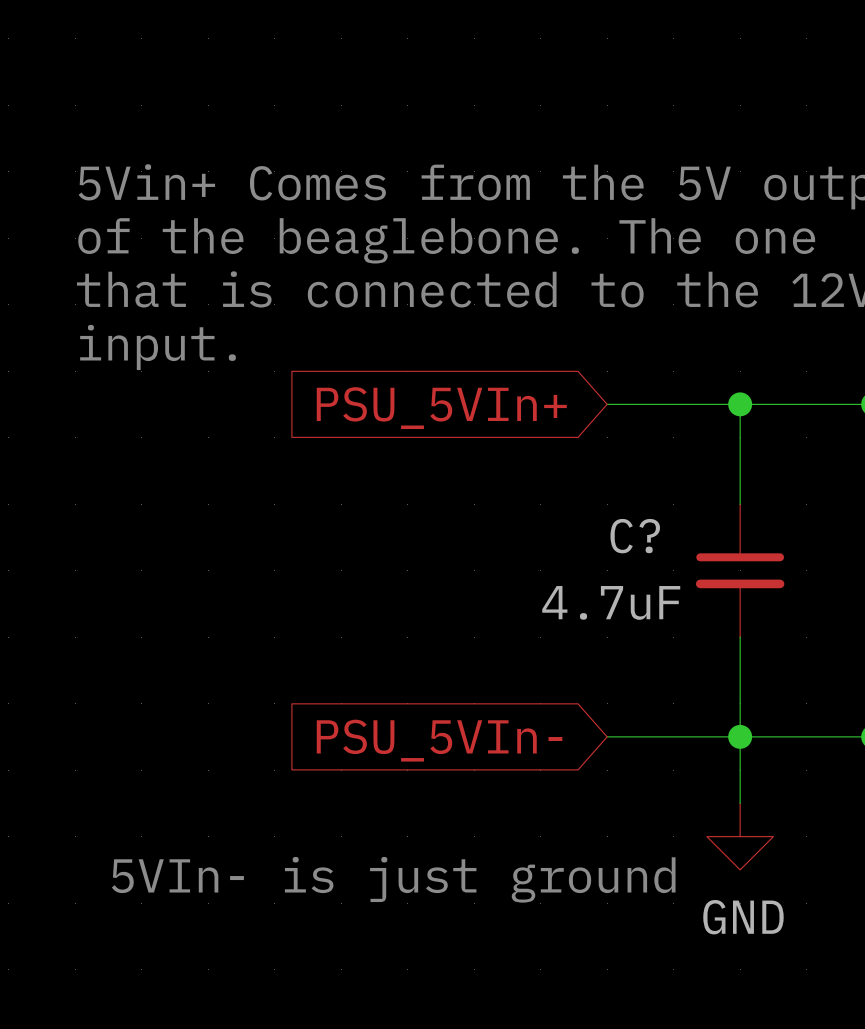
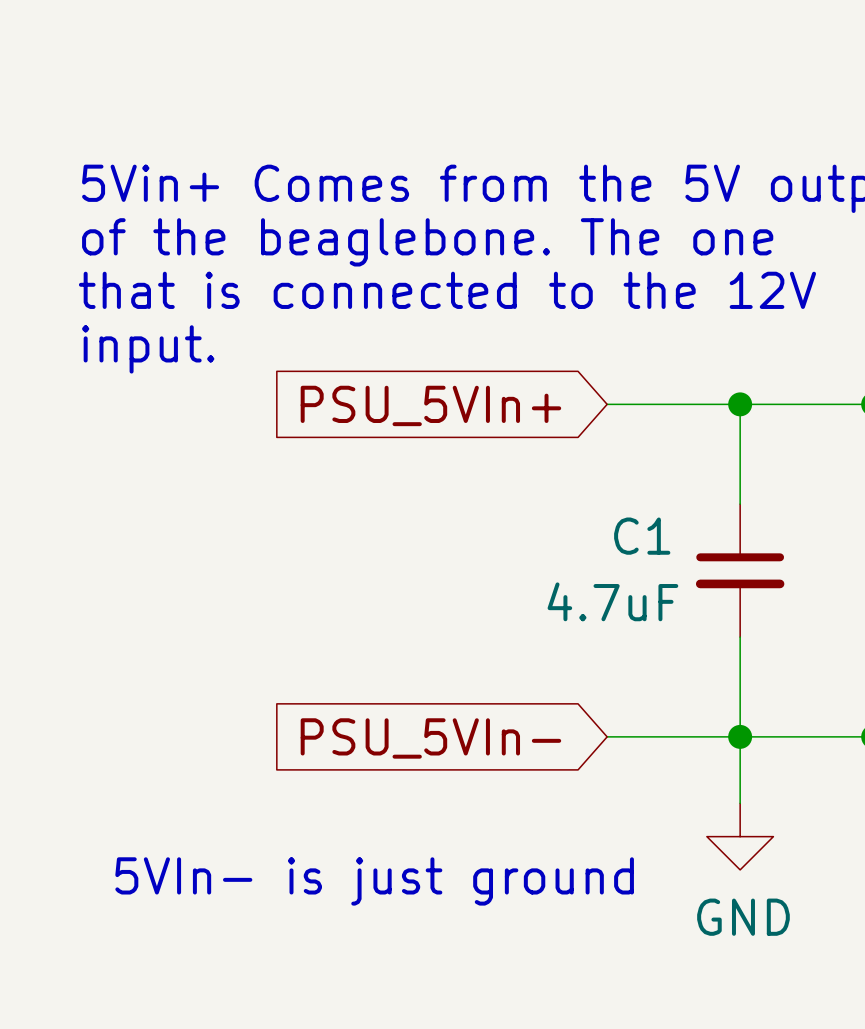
C? name: C? (635, 536) -> C1 (642, 536)

